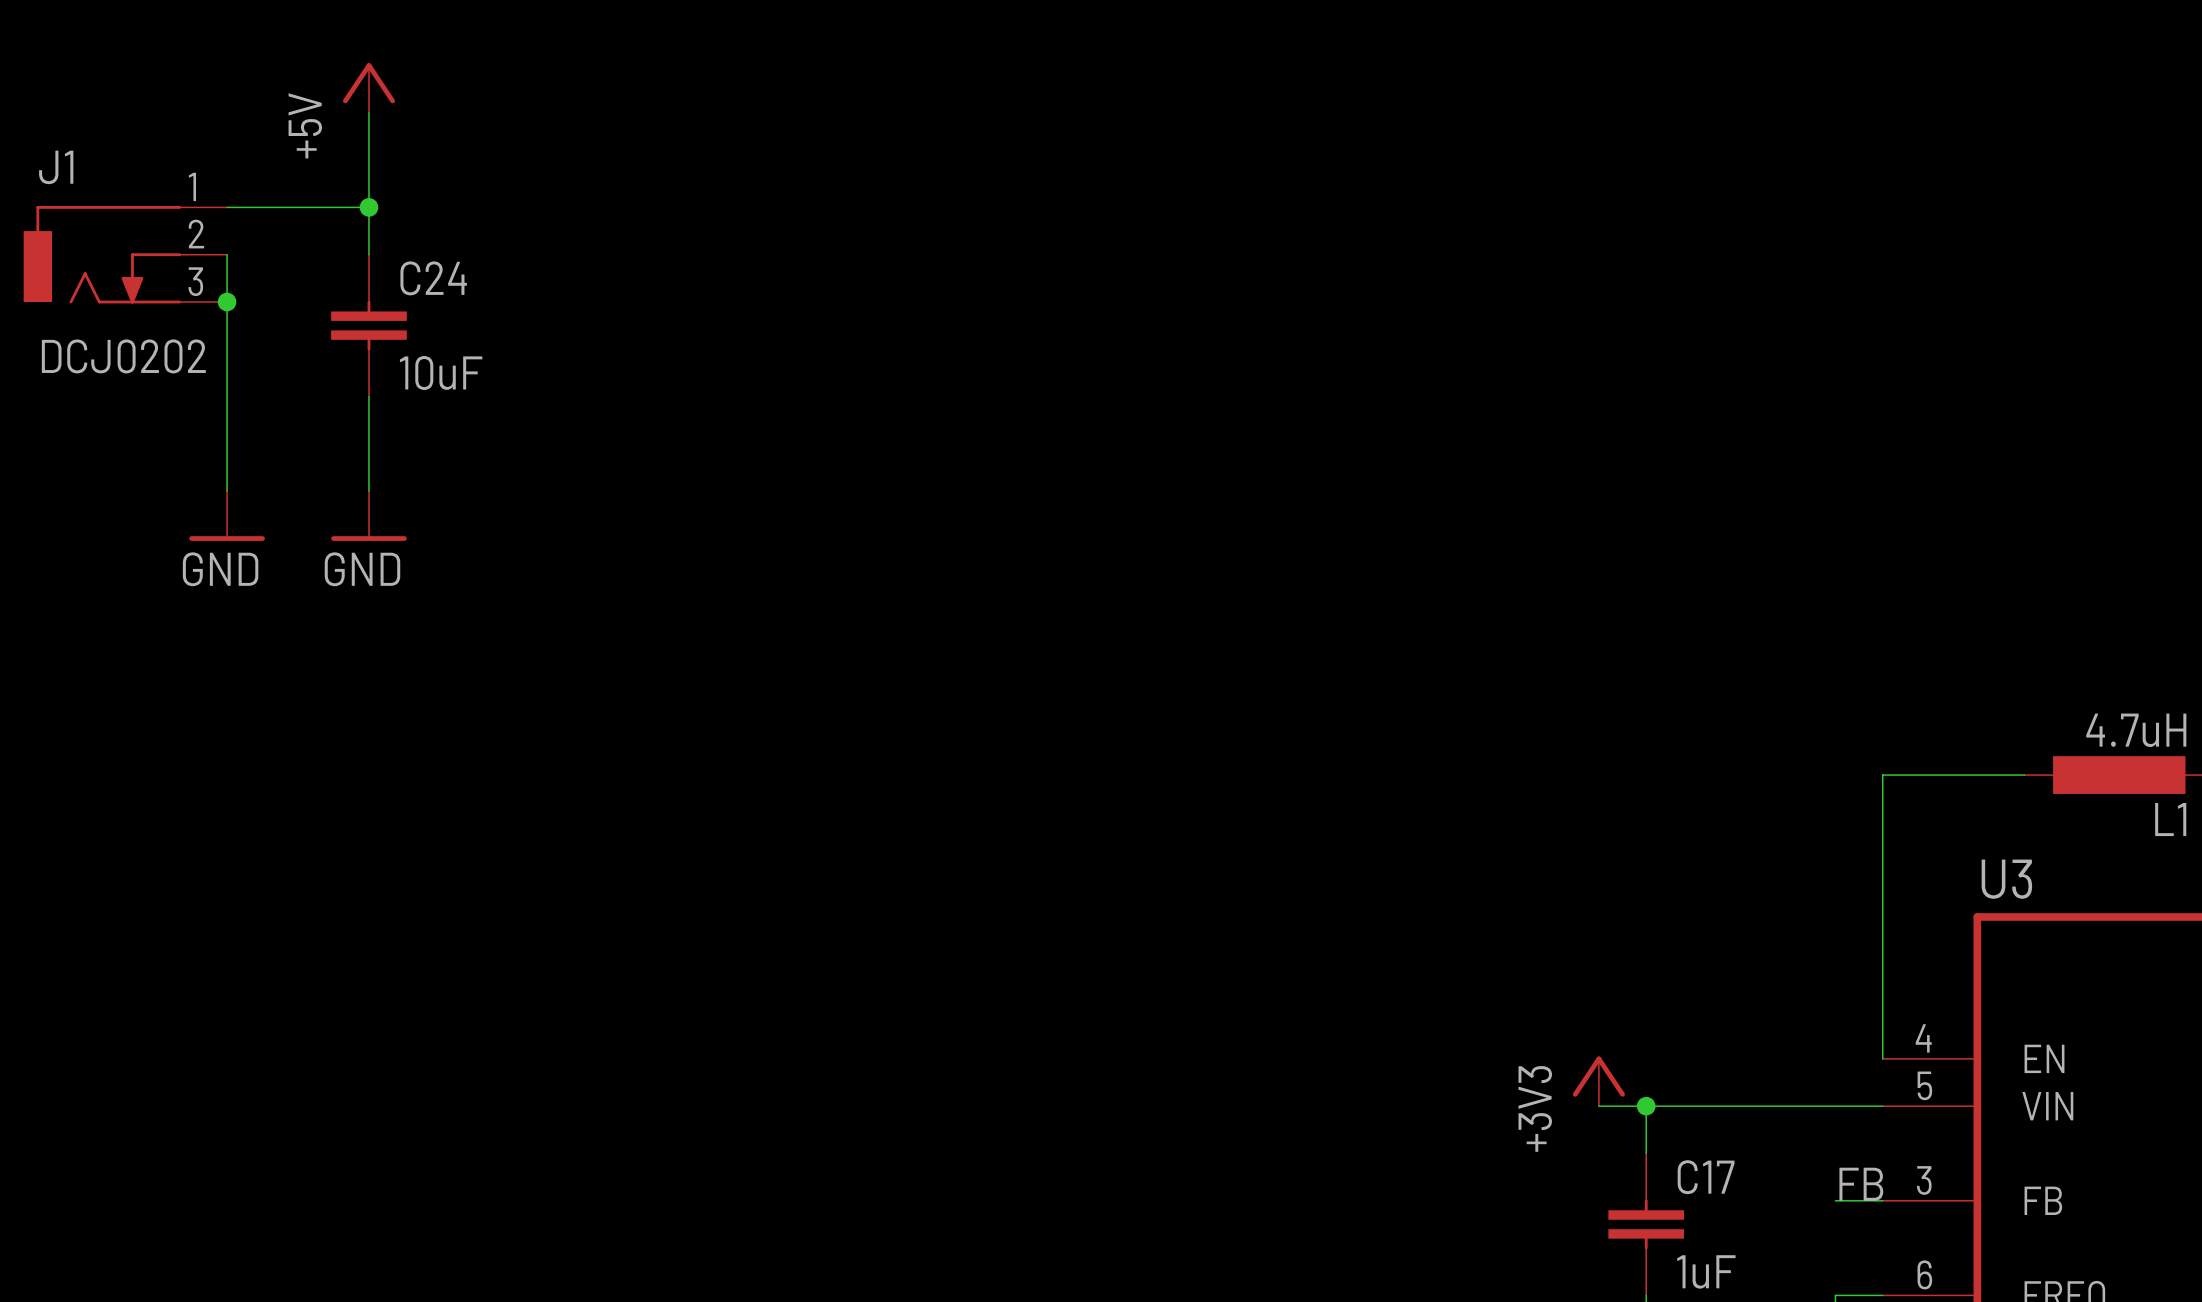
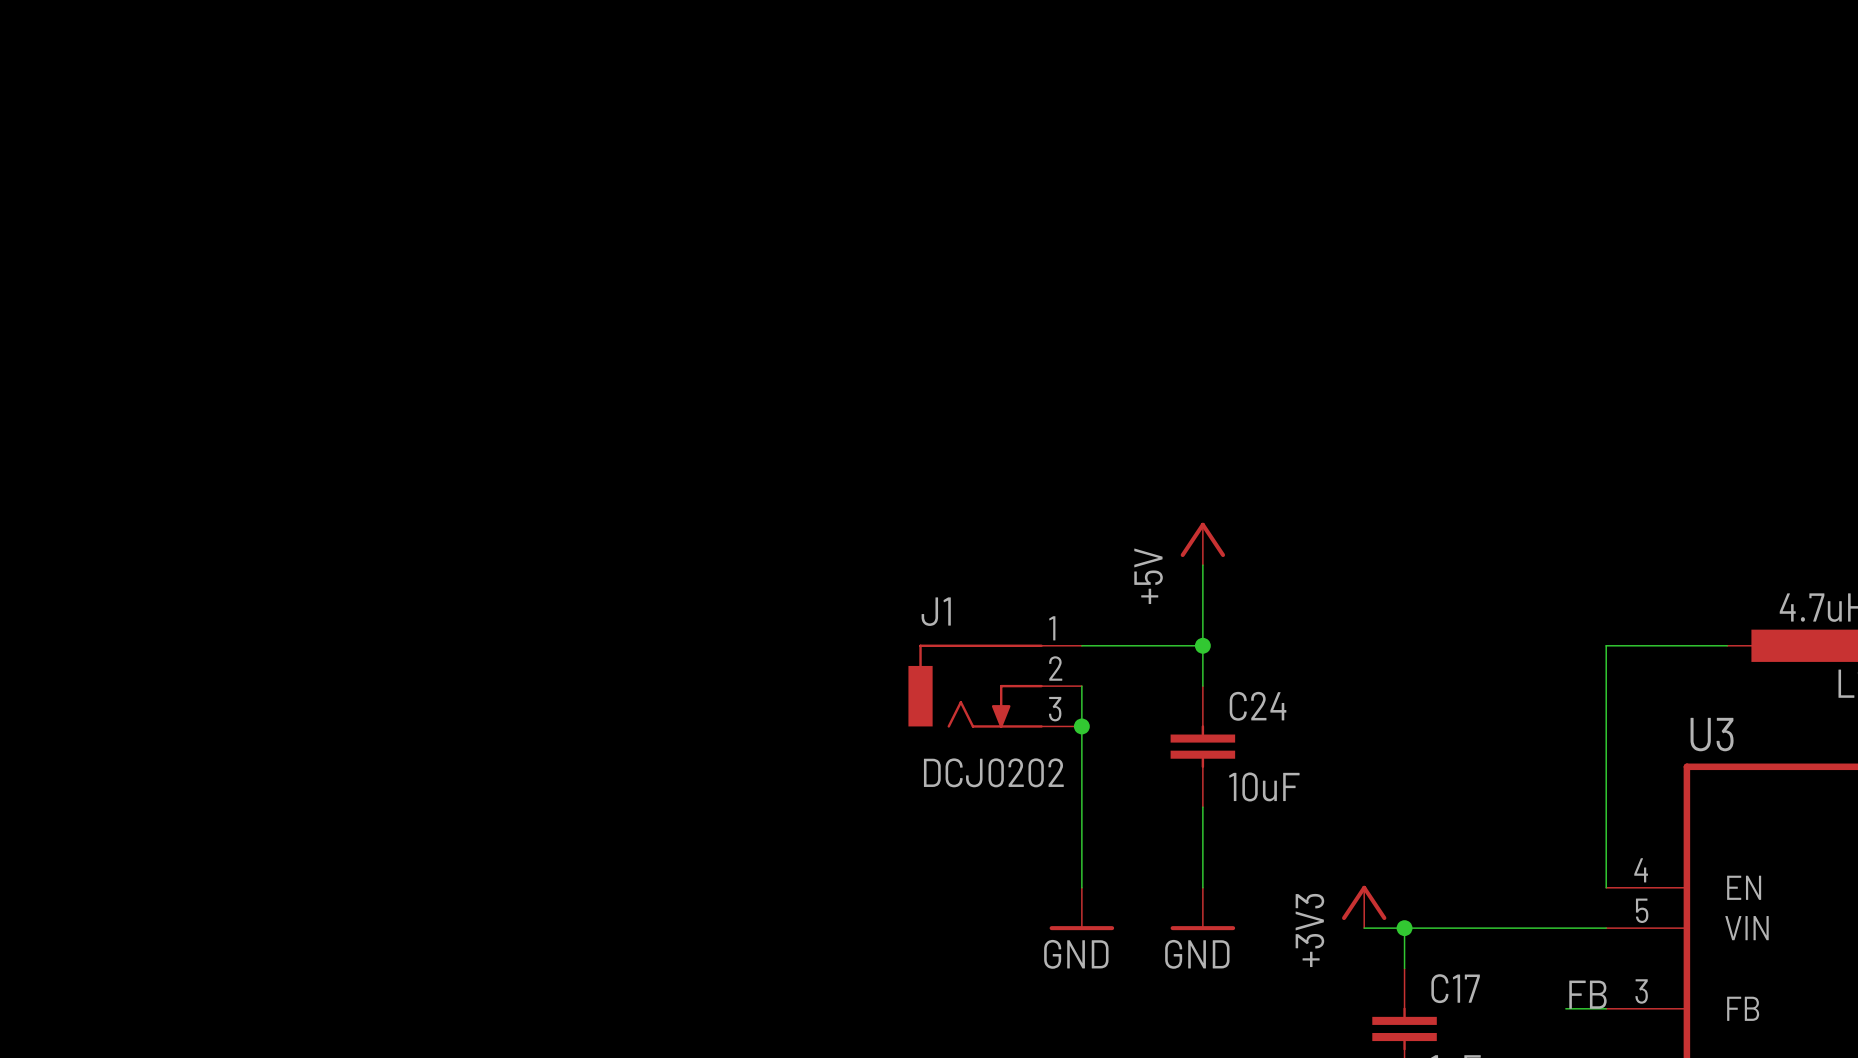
power symbol: +5V (368, 87) -> none
wire: (368, 112) (368, 254) -> none
wire: (227, 207) (368, 207) -> none
junction: (368, 207) -> none
J1 position: (125, 254) -> (995, 686)
wire: (227, 254) (227, 491) -> none
junction: (227, 302) -> none
C24 position: (368, 325) -> (1202, 746)
wire: (368, 396) (368, 491) -> none
power symbol: GND (227, 516) -> none
power symbol: GND (368, 516) -> none
power symbol: none -> +5V (1202, 543)
wire: none -> (1202, 565) (1202, 686)
wire: none -> (1081, 645) (1202, 645)
junction: none -> (1202, 645)
wire: none -> (1081, 686) (1081, 887)
junction: none -> (1081, 726)
wire: none -> (1202, 807) (1202, 887)
power symbol: none -> GND (1081, 908)
power symbol: none -> GND (1202, 908)

